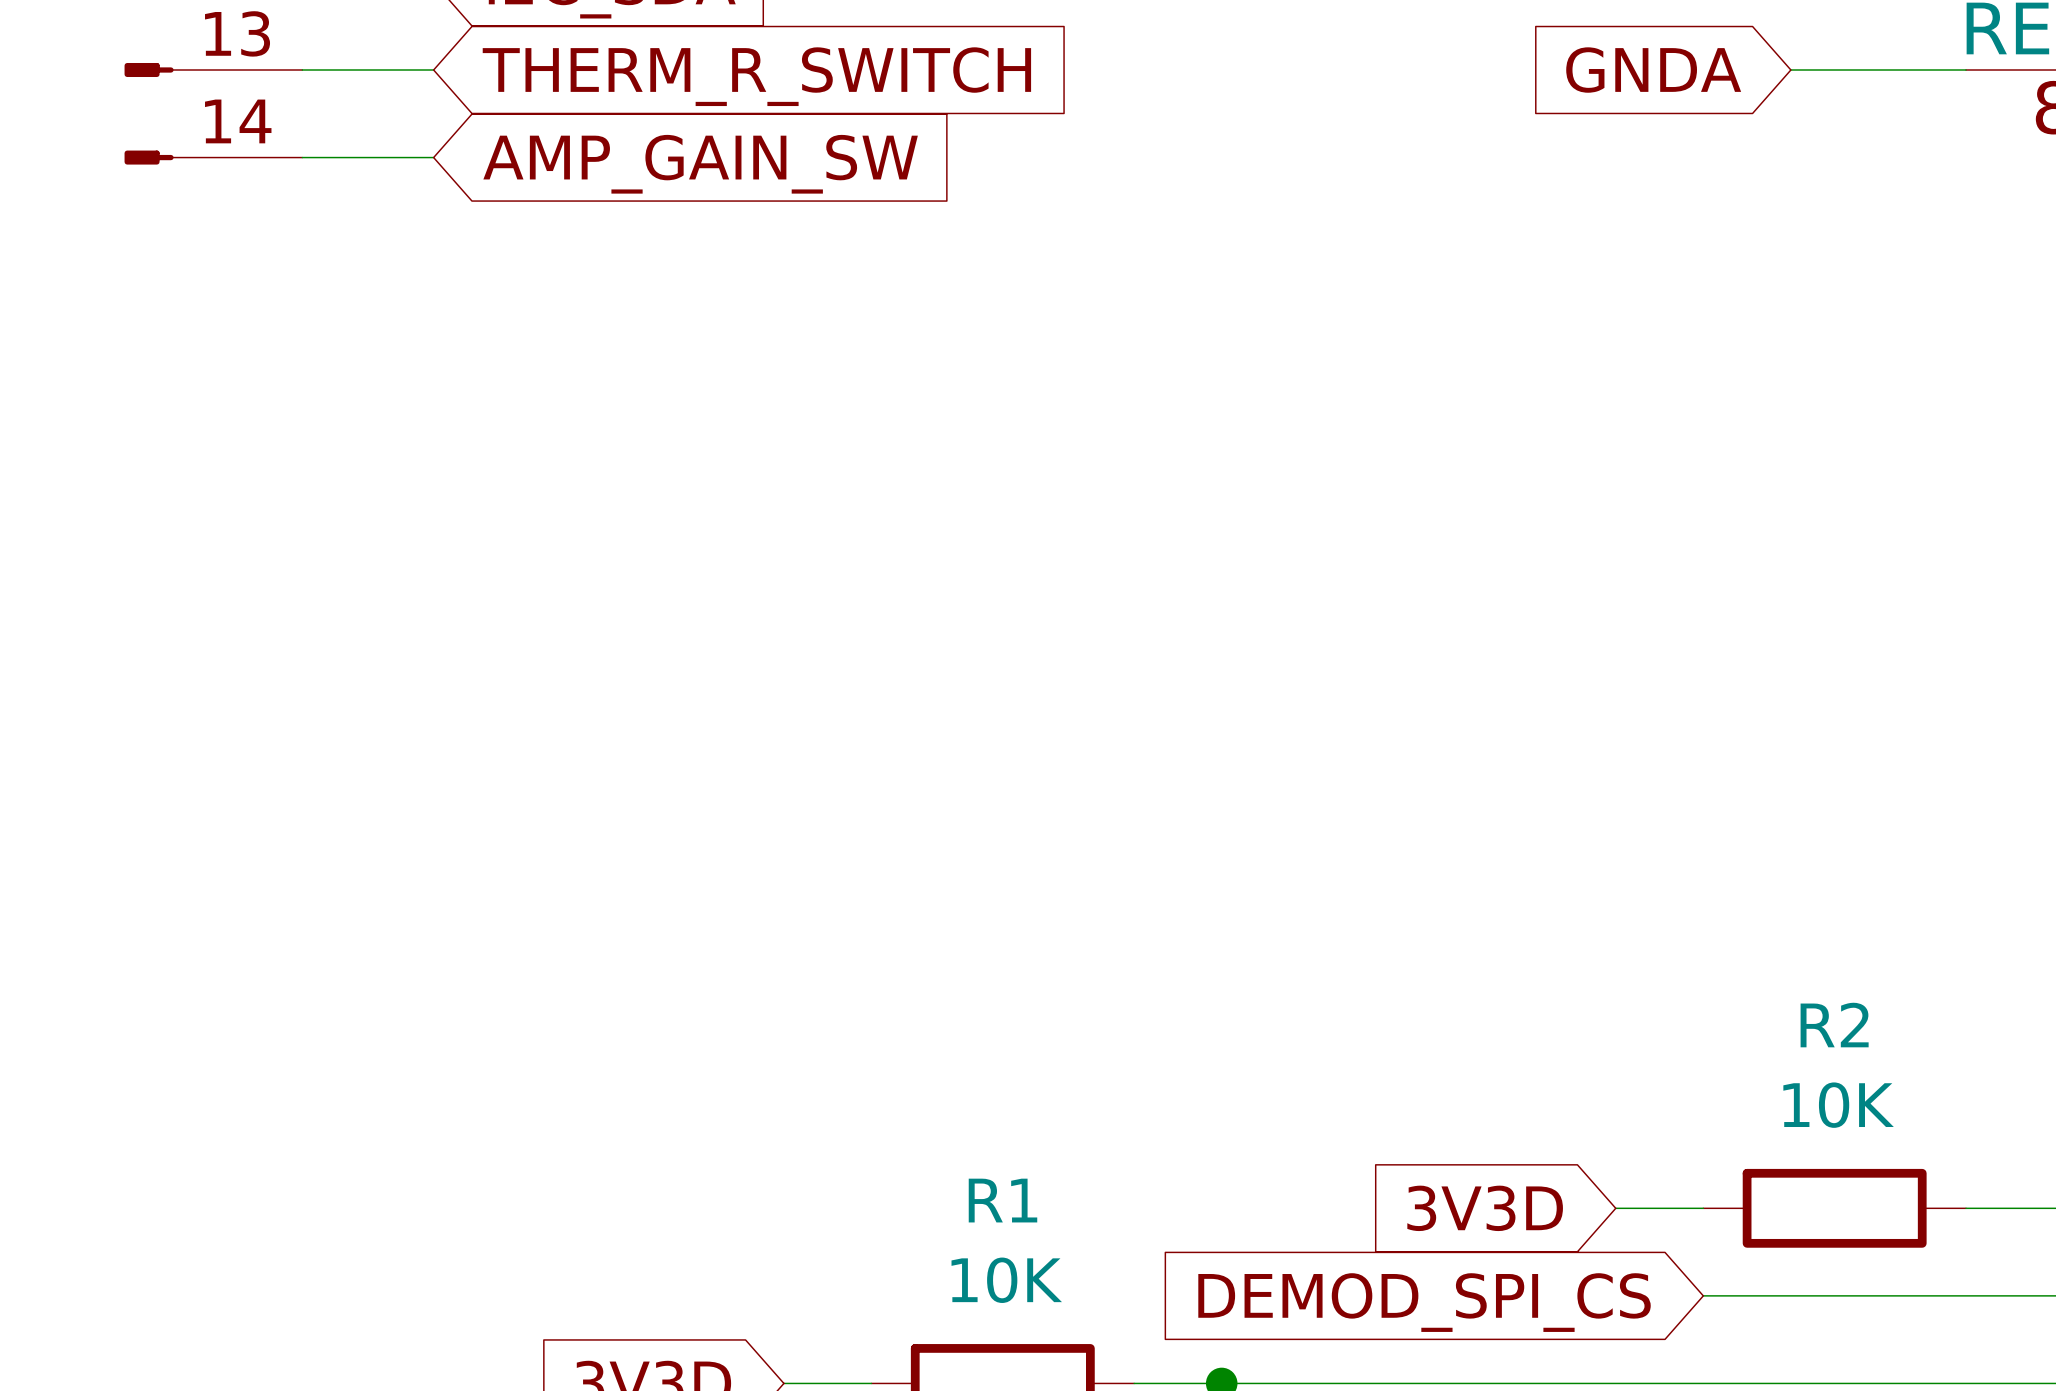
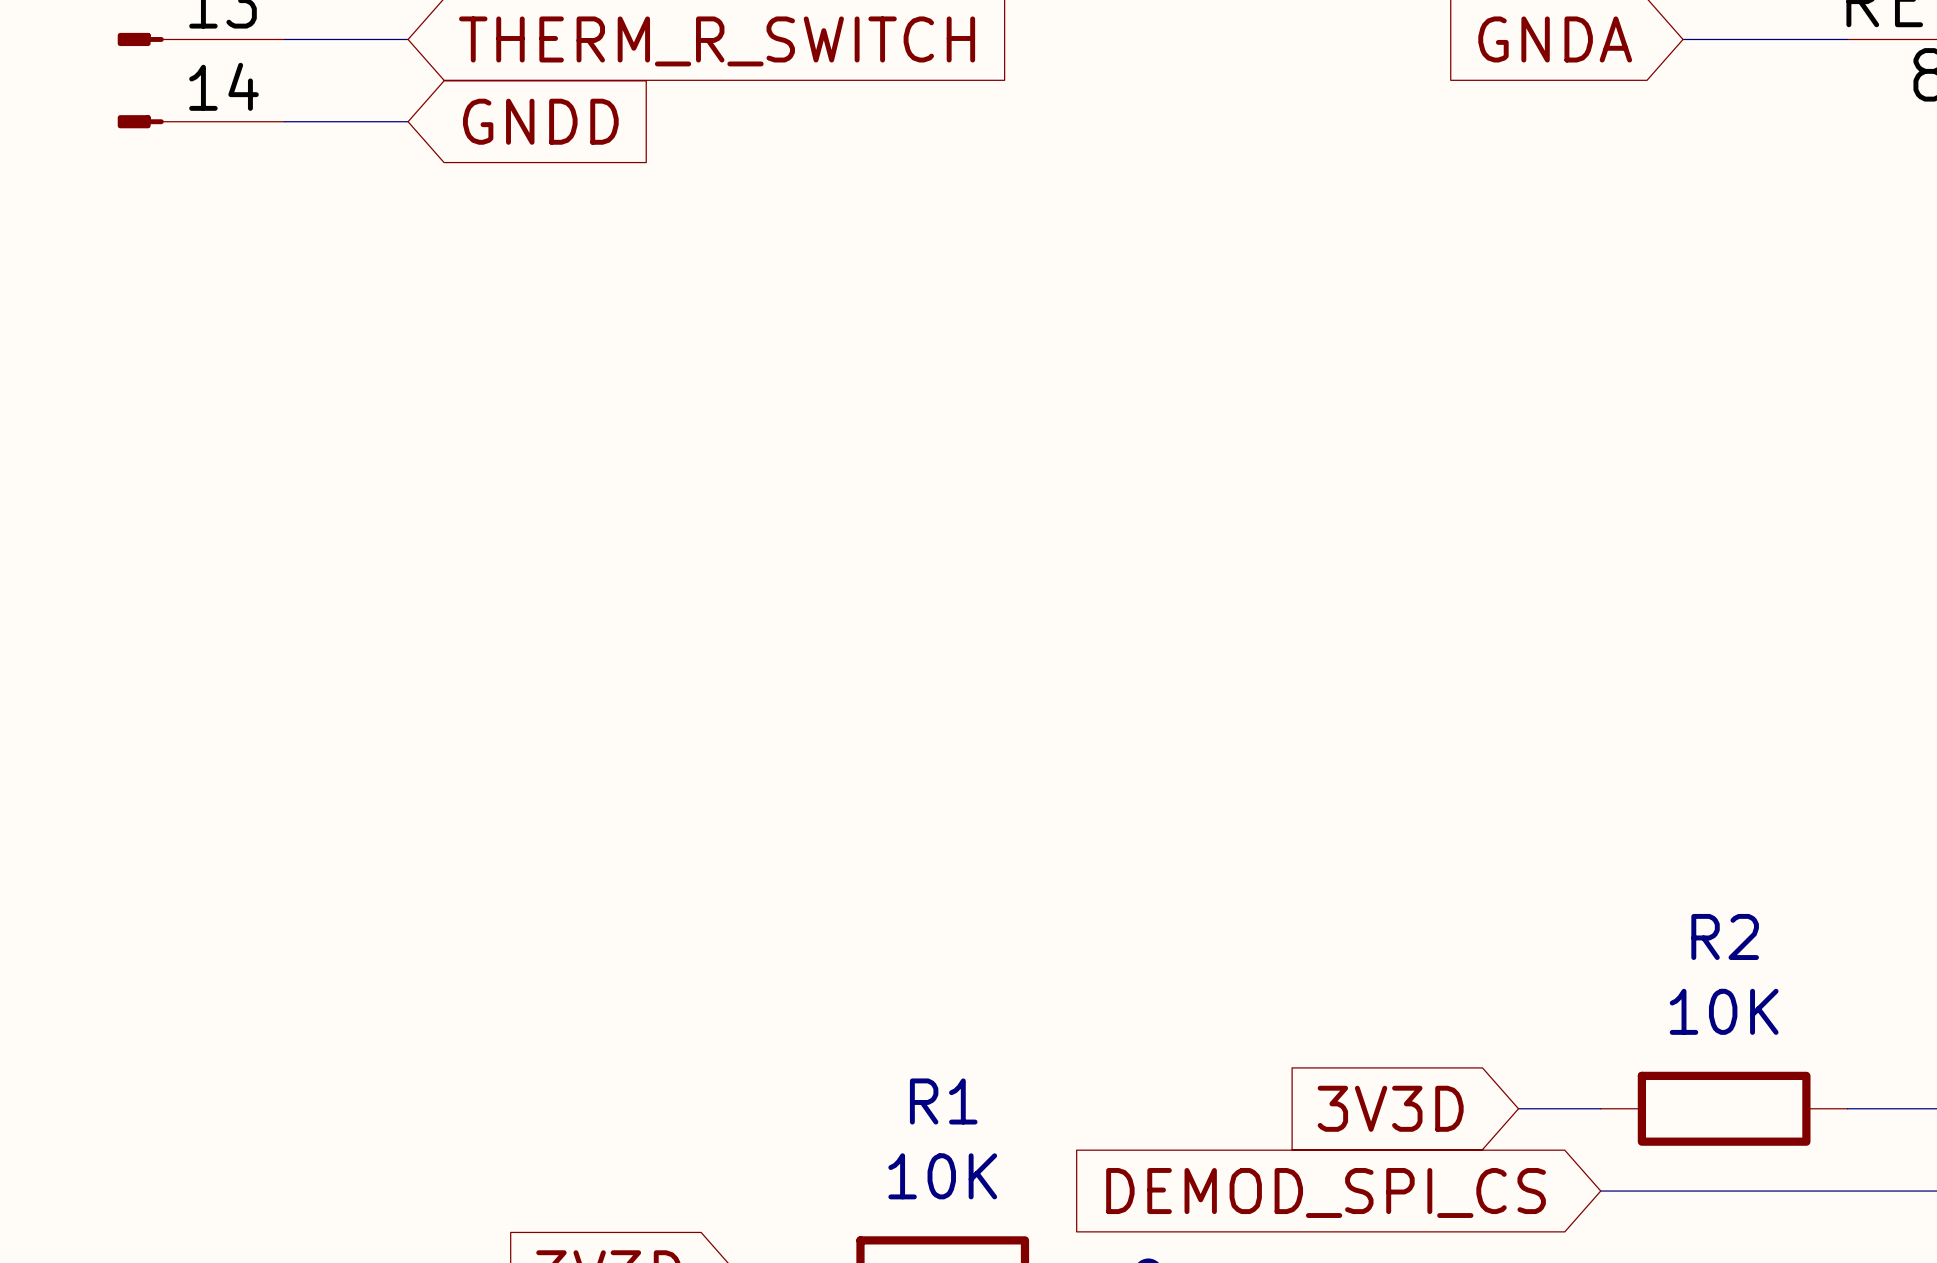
global label: AMP_GAIN_SW (700, 164) -> GNDD (540, 121)

